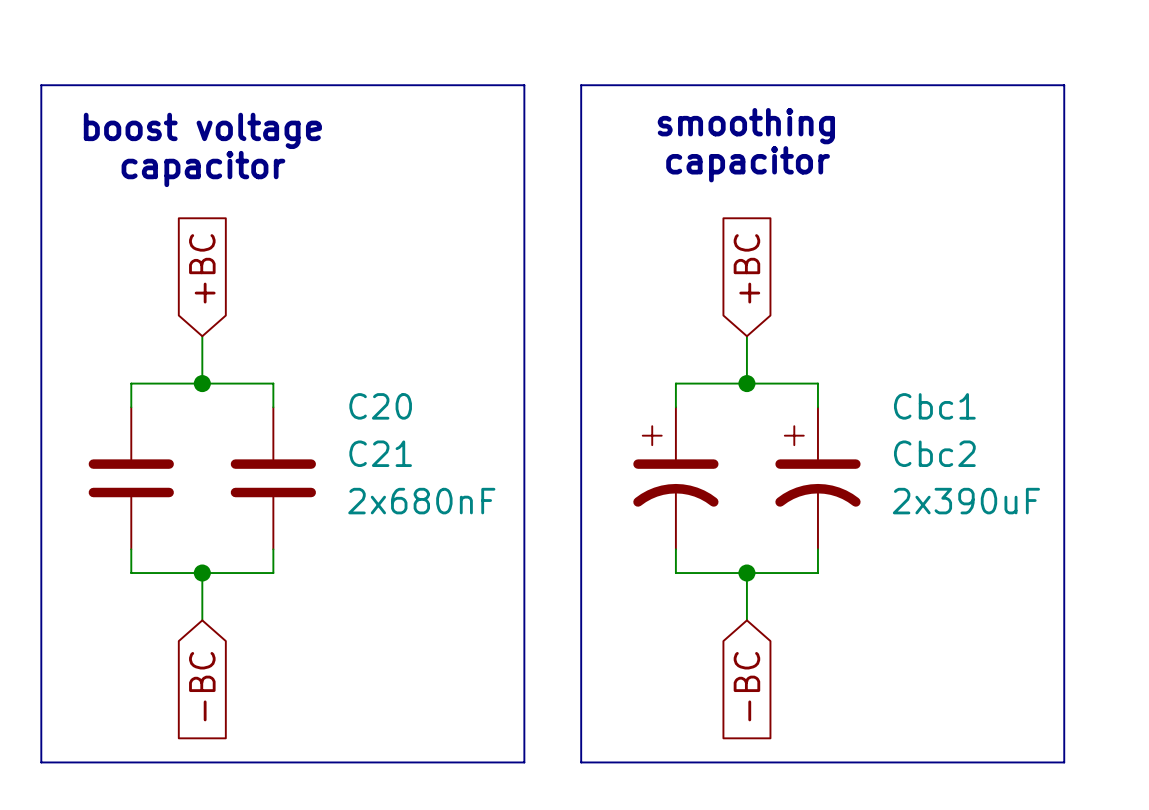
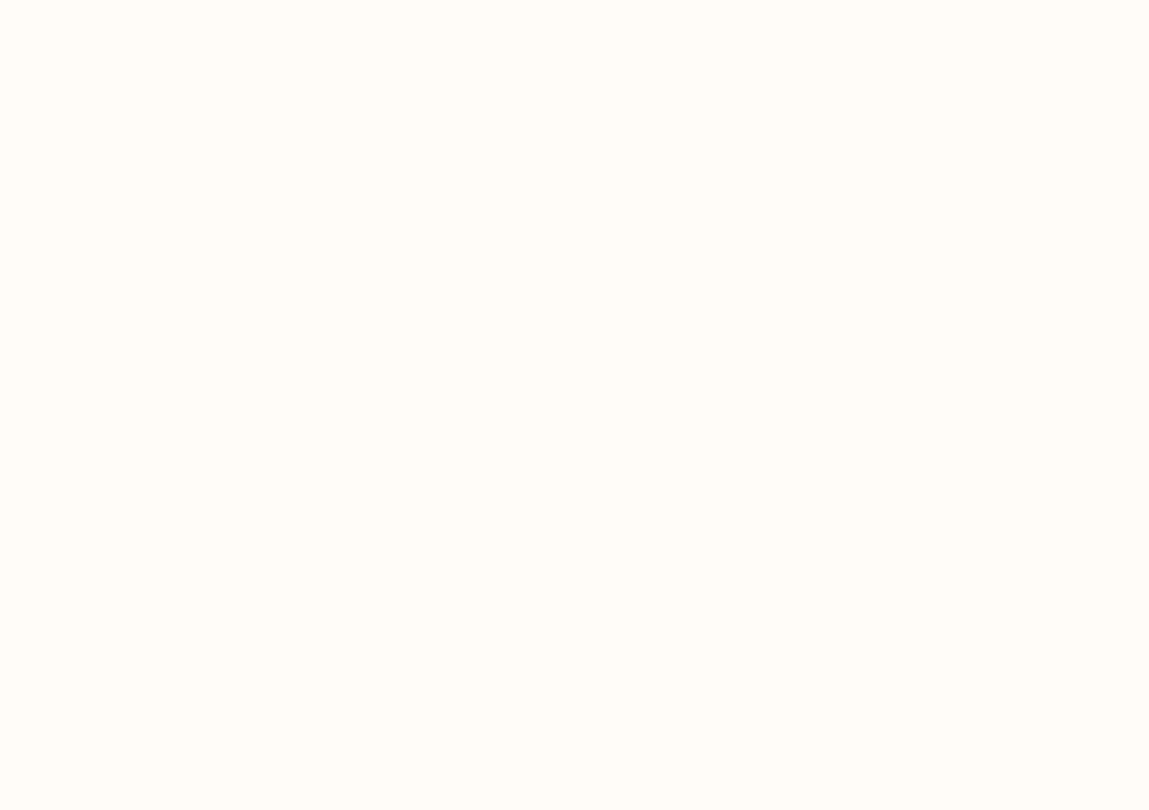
line: (41, 85) (524, 85) (524, 762) (41, 762) (41, 85) -> none
line: (581, 85) (1064, 85) (1064, 762) (581, 762) (581, 85) -> none
text: smoothing (746, 126) -> none
text: boost voltage (202, 130) -> none
text: capacitor (748, 164) -> none
text: capacitor (203, 168) -> none
global label: +BC (202, 268) -> none
global label: +BC (746, 268) -> none
wire: (202, 336) (202, 383) -> none
wire: (746, 336) (746, 383) -> none
junction: (202, 383) -> none
junction: (746, 383) -> none
wire: (131, 407) (131, 383) (273, 383) (273, 407) -> none
wire: (675, 407) (675, 383) (817, 383) (817, 407) -> none
C20: (131, 478) -> none
C21: 2x680nF (273, 478) -> none
Cbc2: (675, 478) -> none
Cbc1: 2x390uF (817, 478) -> none
wire: (131, 549) (131, 573) (273, 573) (273, 549) -> none
wire: (675, 549) (675, 573) (817, 573) (817, 549) -> none
wire: (202, 573) (202, 620) -> none
junction: (202, 573) -> none
wire: (746, 573) (746, 620) -> none
junction: (746, 573) -> none
global label: -BC (202, 686) -> none
global label: -BC (746, 686) -> none

